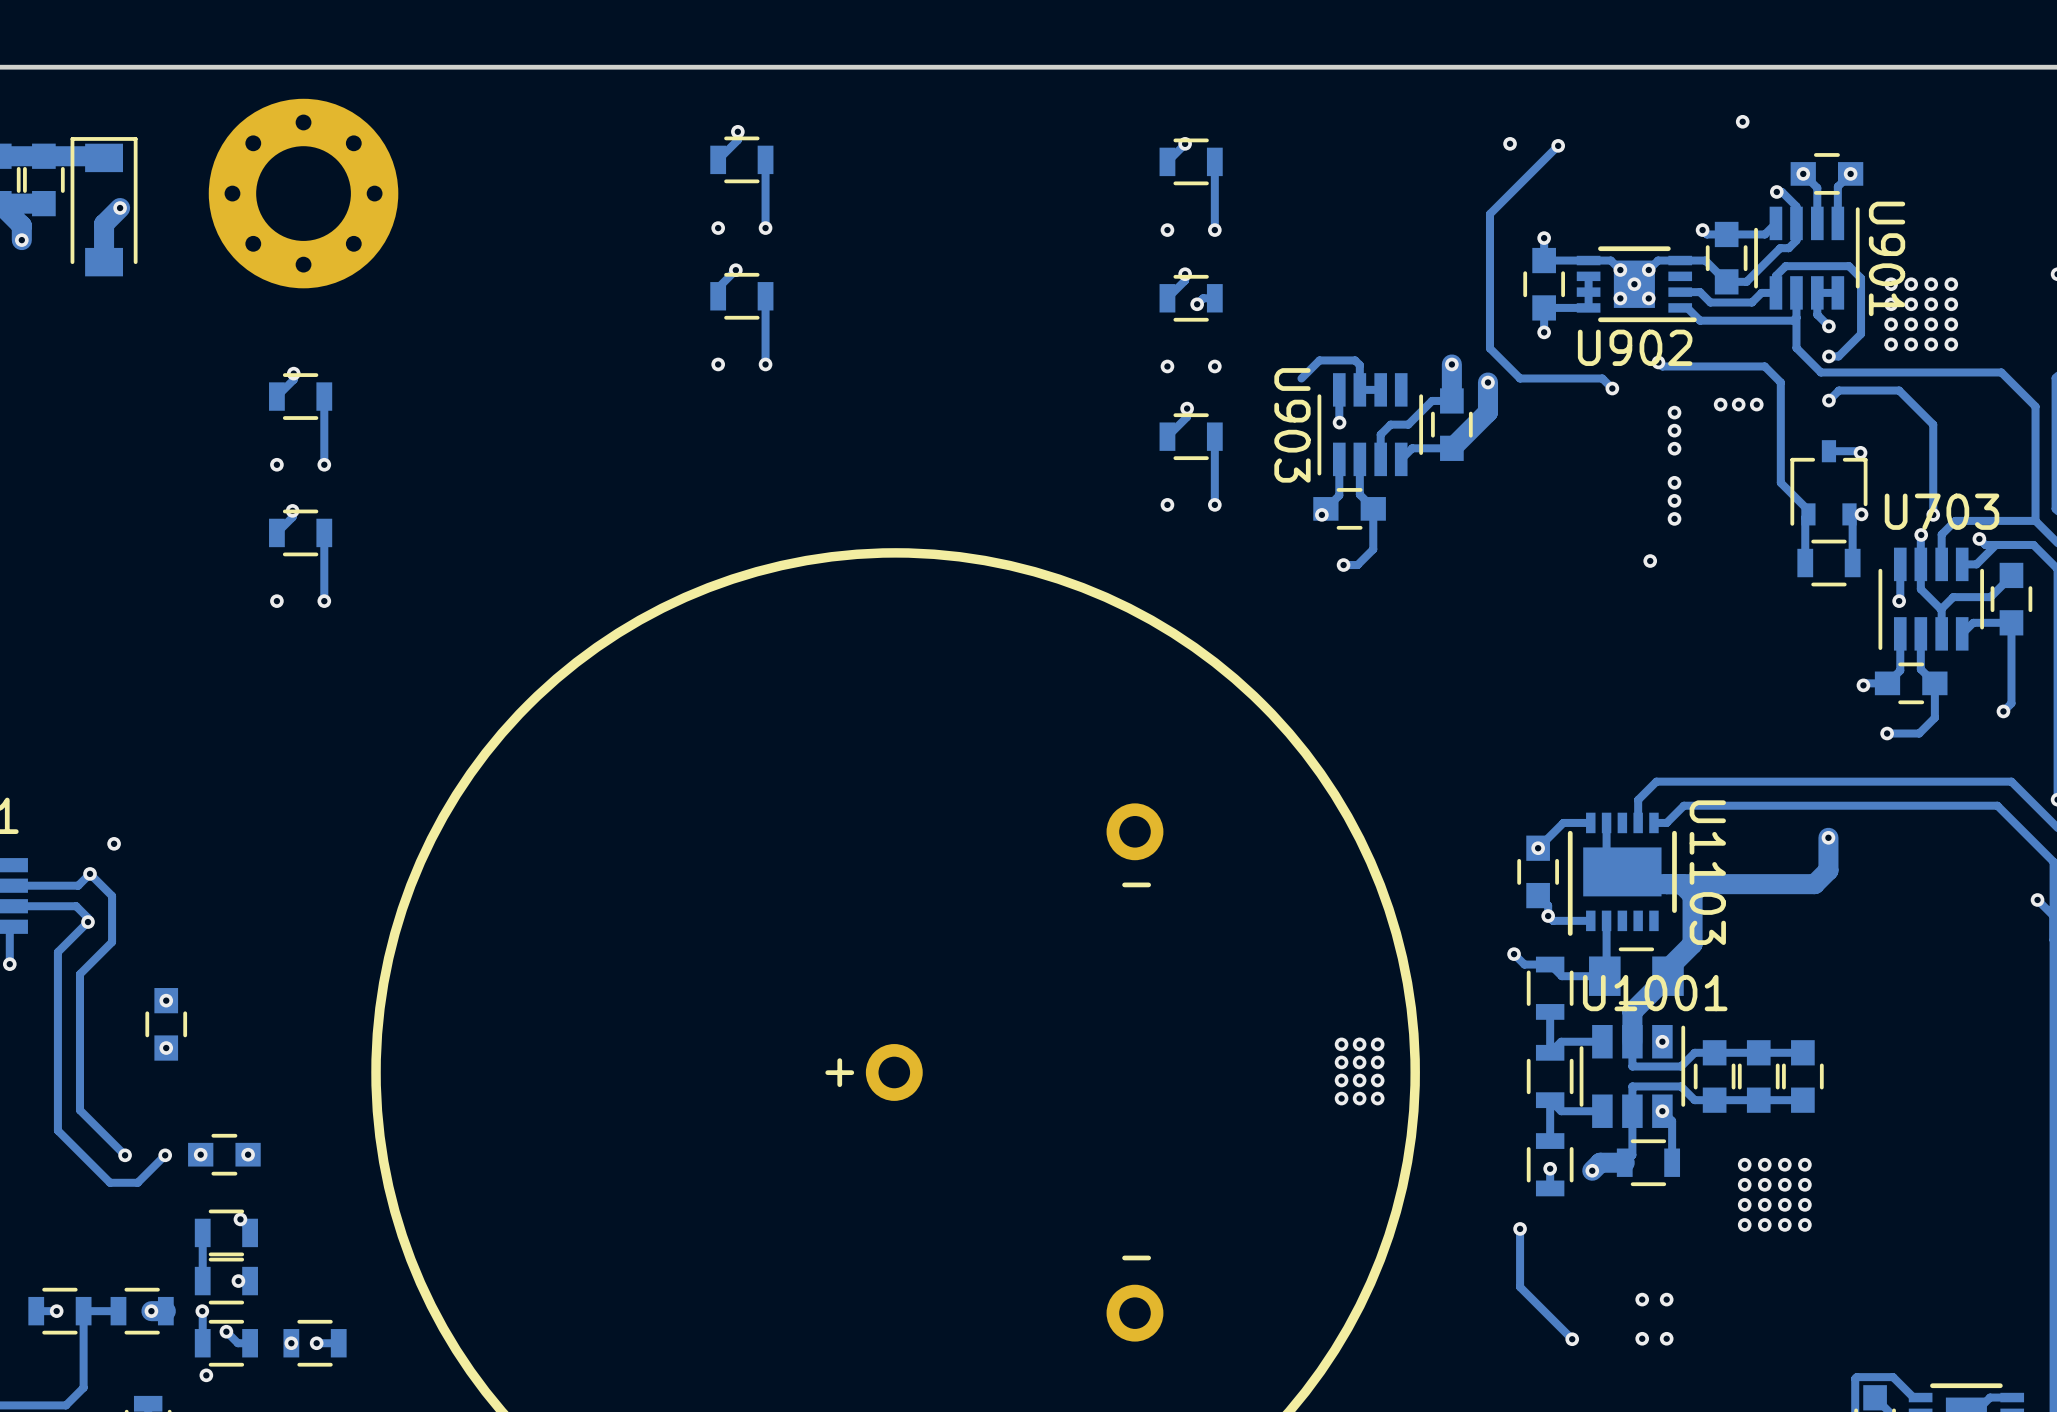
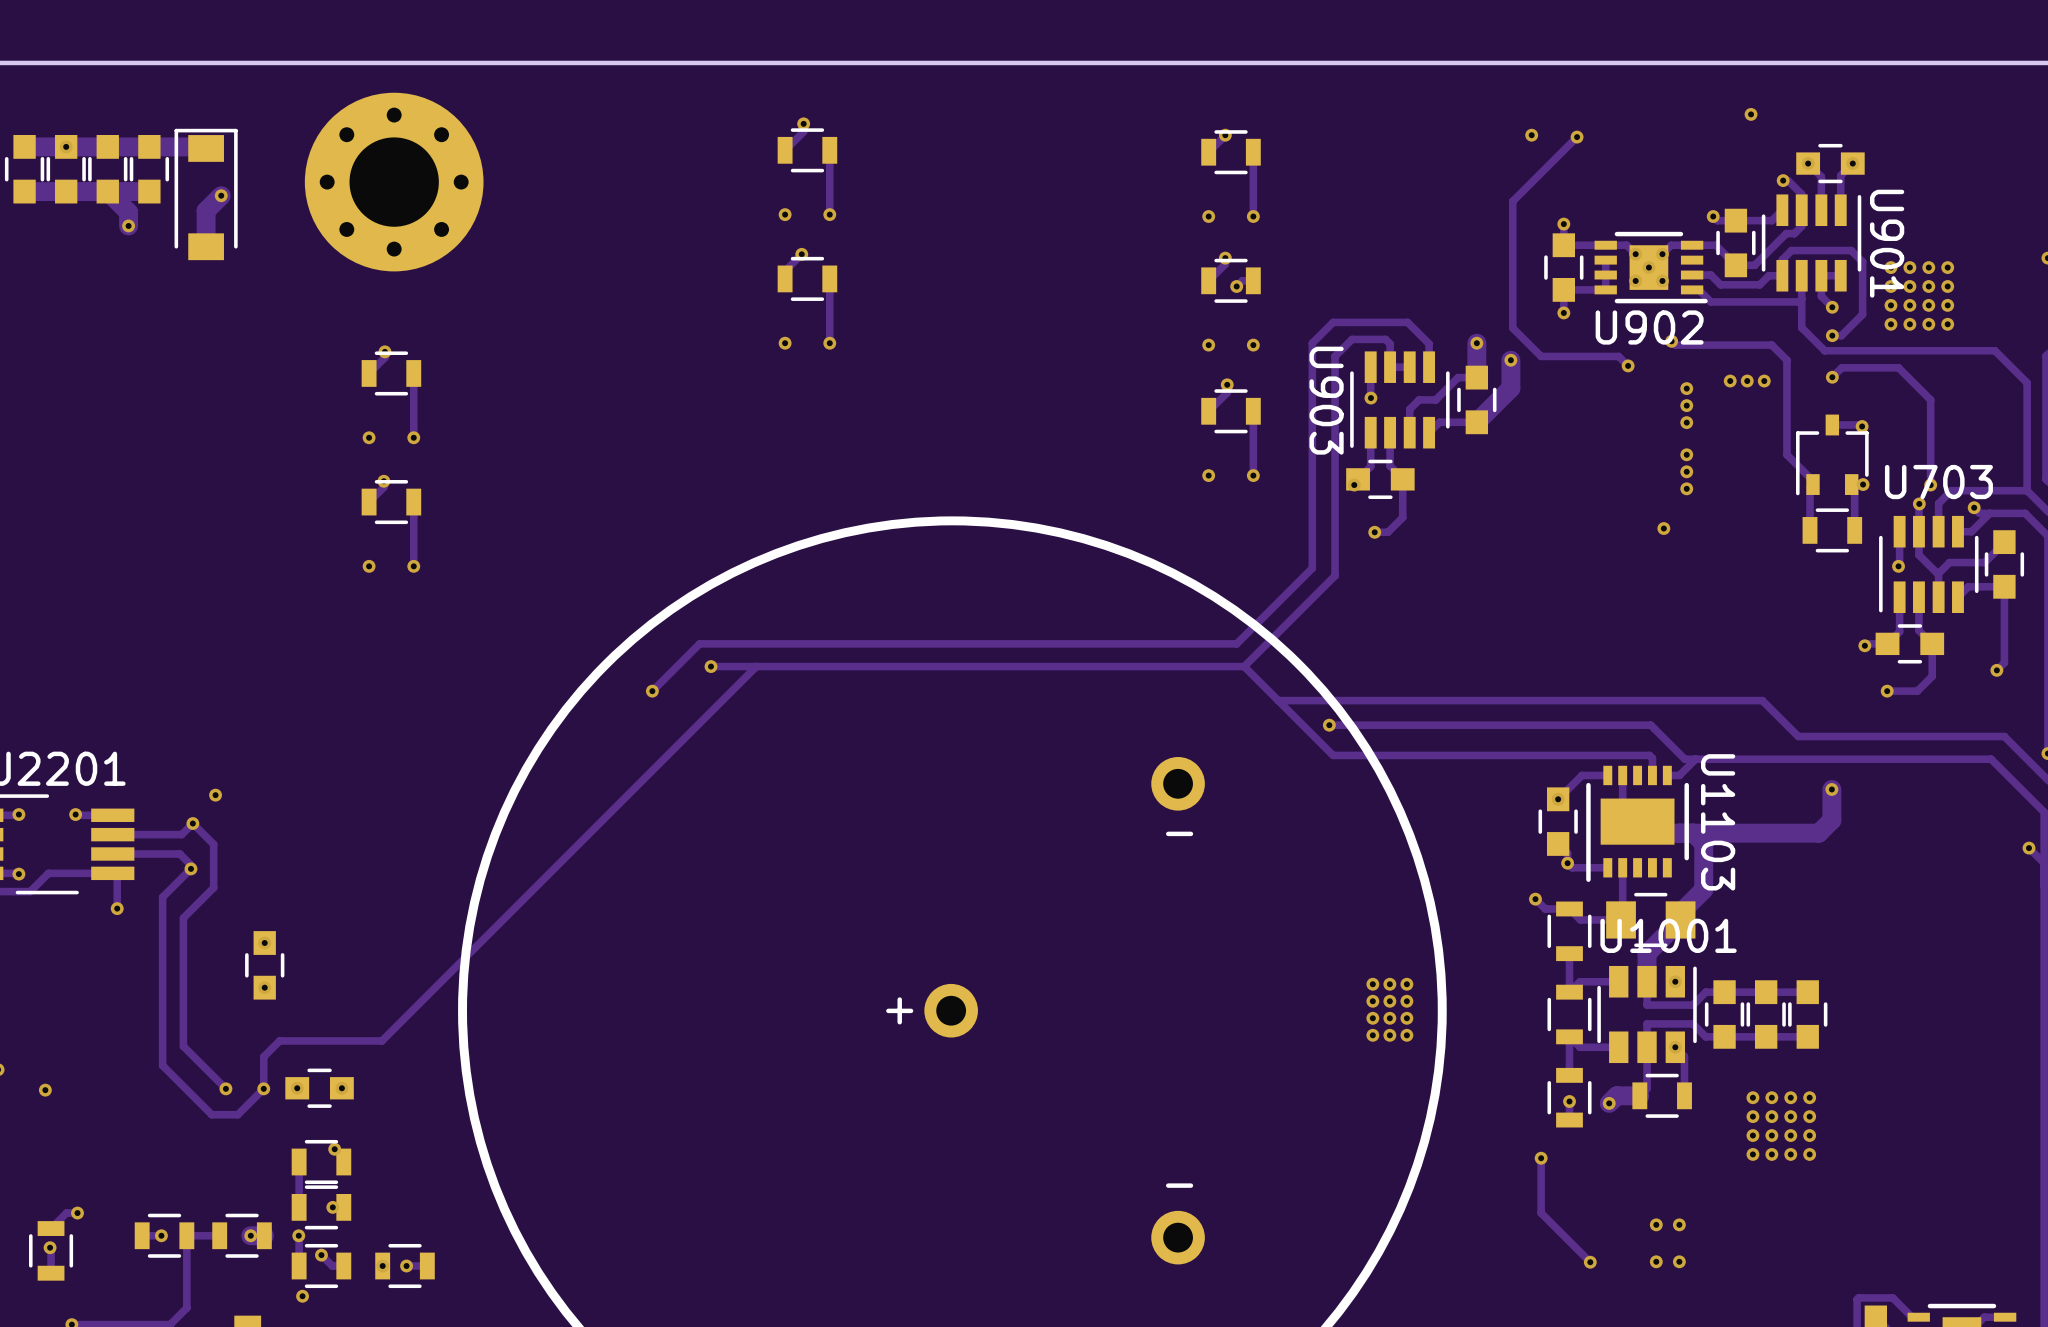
track: none -> (1335, 356) (1335, 575) (1244, 666)
track: none -> (1429, 367) (1429, 343) (1407, 322) (1333, 322) (1312, 343) (1312, 568) (1236, 643) (699, 643) (652, 691)
via: none -> (711, 666)
track: none -> (756, 666) (381, 1040) (279, 1040) (263, 1056) (263, 1088)
track: none -> (1244, 666) (711, 666)
track: none -> (1244, 666) (1333, 755) (1649, 755) (1652, 758)
via: none -> (652, 691)
track: none -> (1329, 725) (1650, 725) (1684, 759) (1695, 759)
via: none -> (1329, 725)
track: (1792, 781) (1656, 781) (1638, 799) (1638, 804) -> (1798, 736) (1762, 700) (1278, 700)

